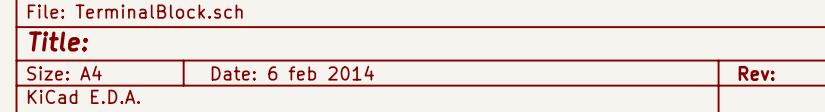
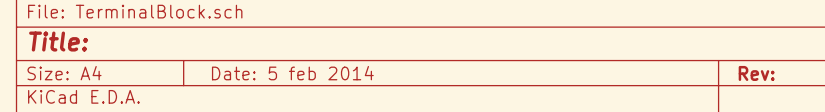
title block: Date: 6 feb 2014 (292, 73) -> Date: 5 feb 2014 (292, 73)

